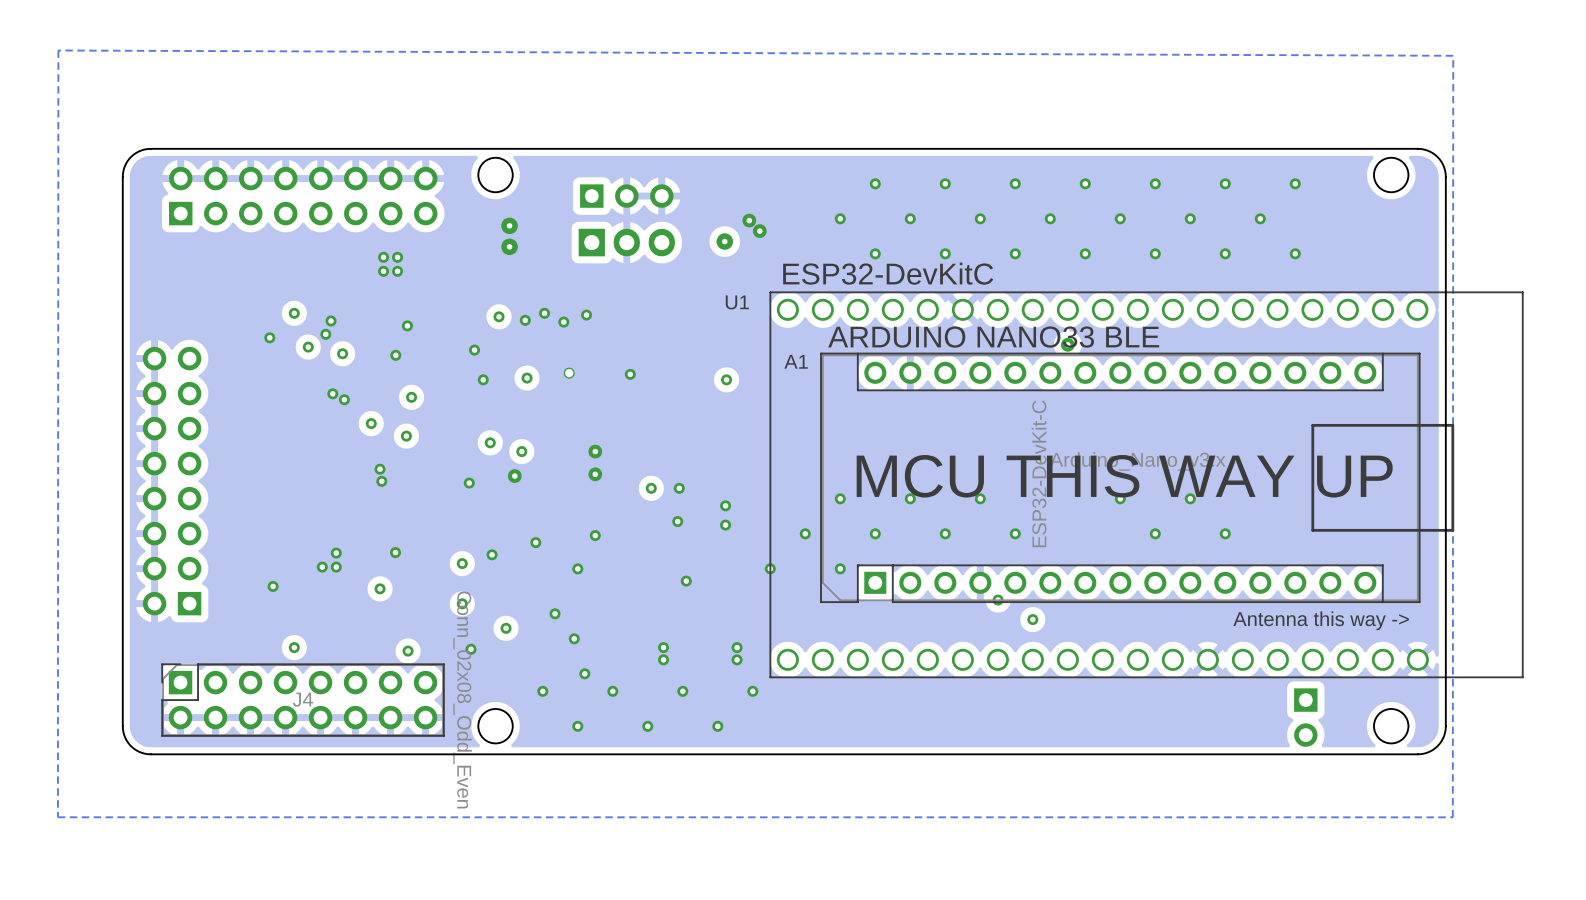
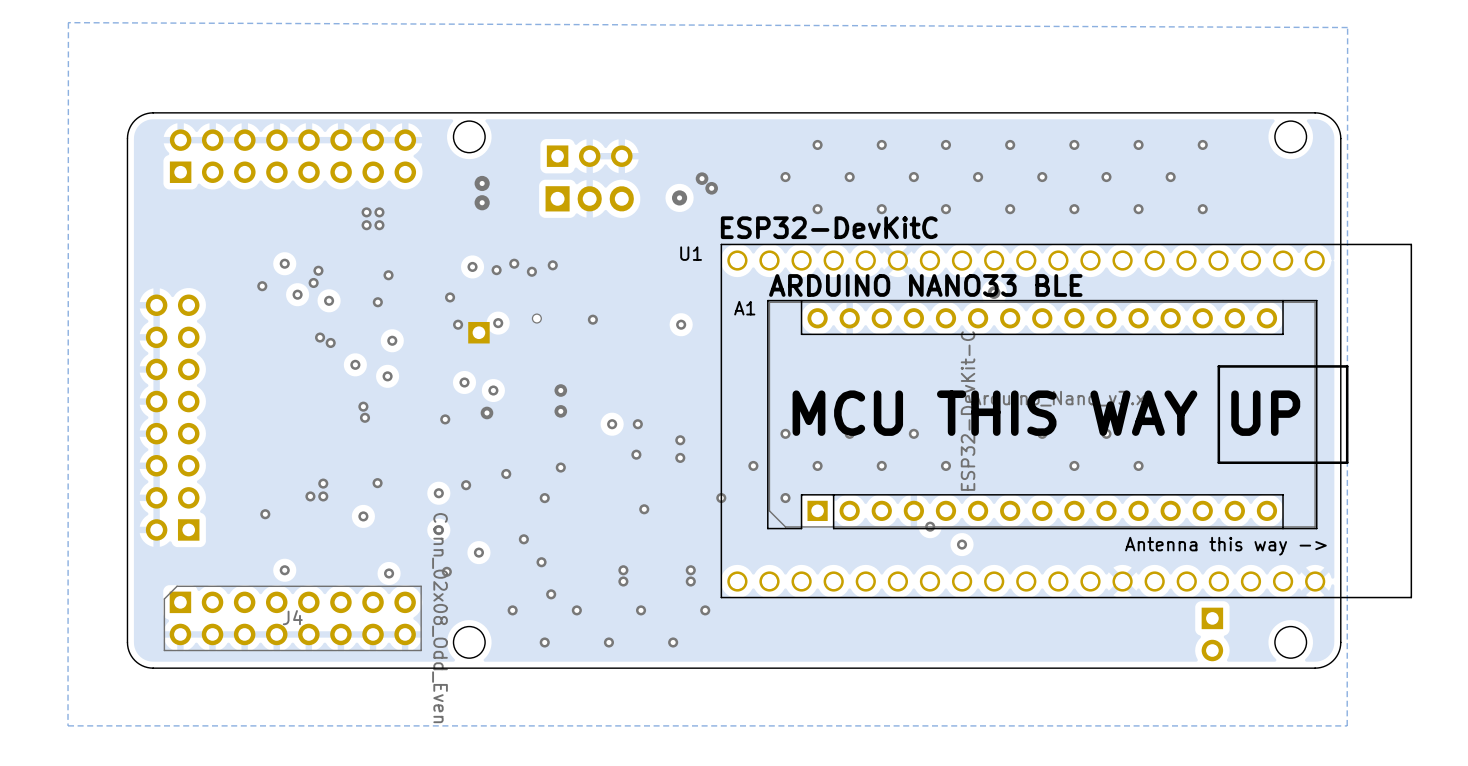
part: none -> (478, 332)
J4 footprint: [161, 663, 445, 737] -> [163, 585, 422, 652]

